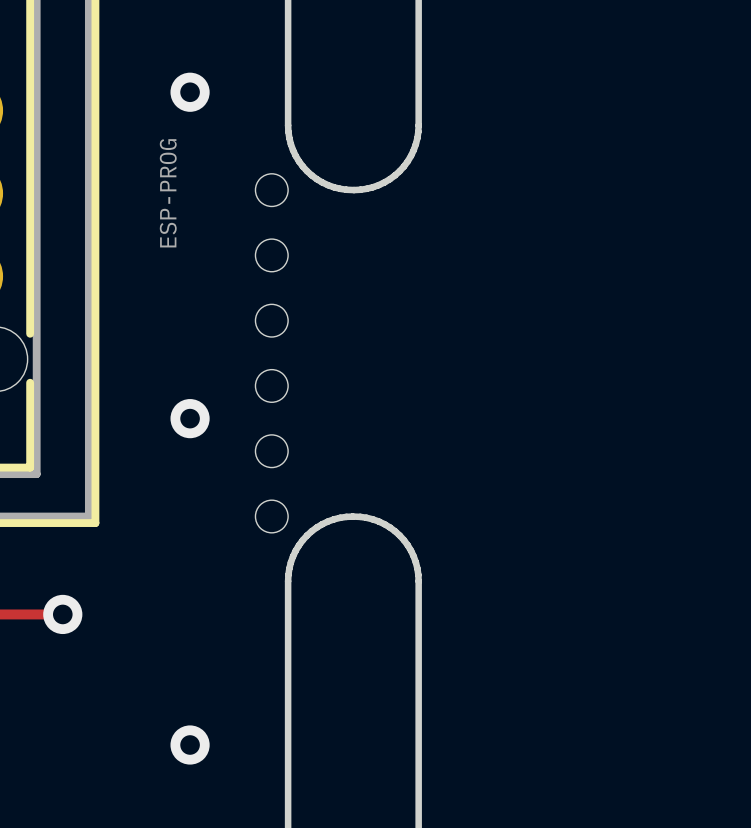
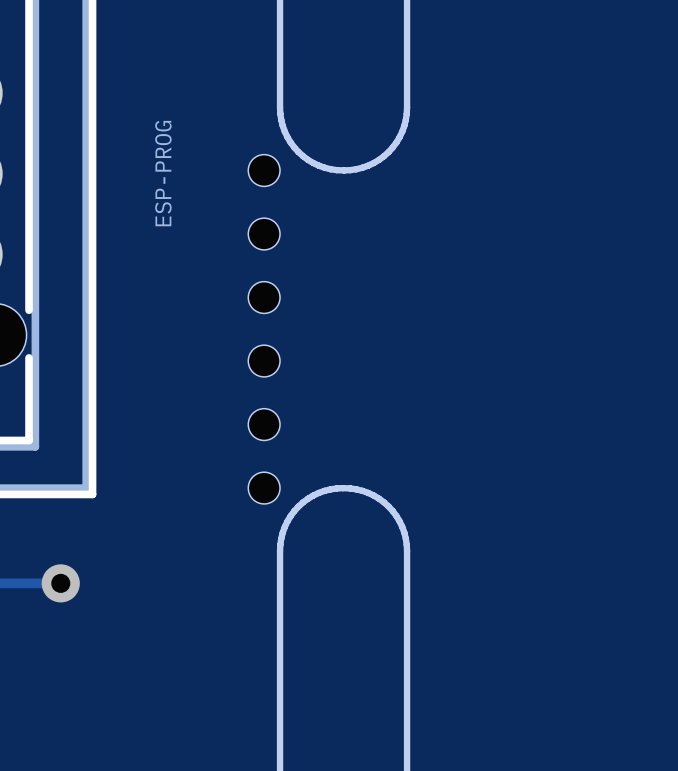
via: (190, 92) -> none
via: (190, 418) -> none
via: (190, 744) -> none

